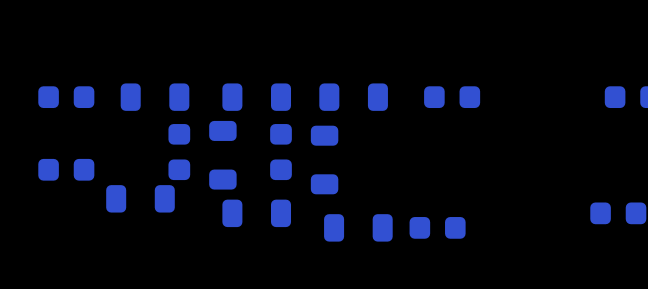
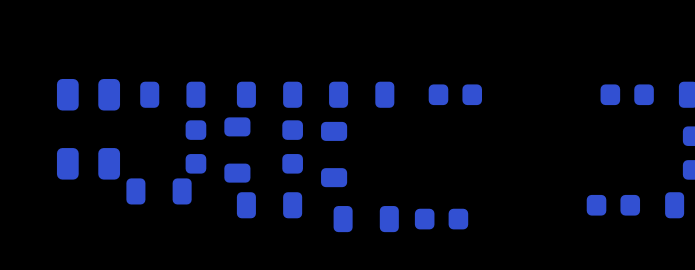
part footprint: [38, 86, 95, 109] -> [56, 78, 121, 111]
part footprint: [38, 158, 95, 181] -> [56, 148, 121, 180]

